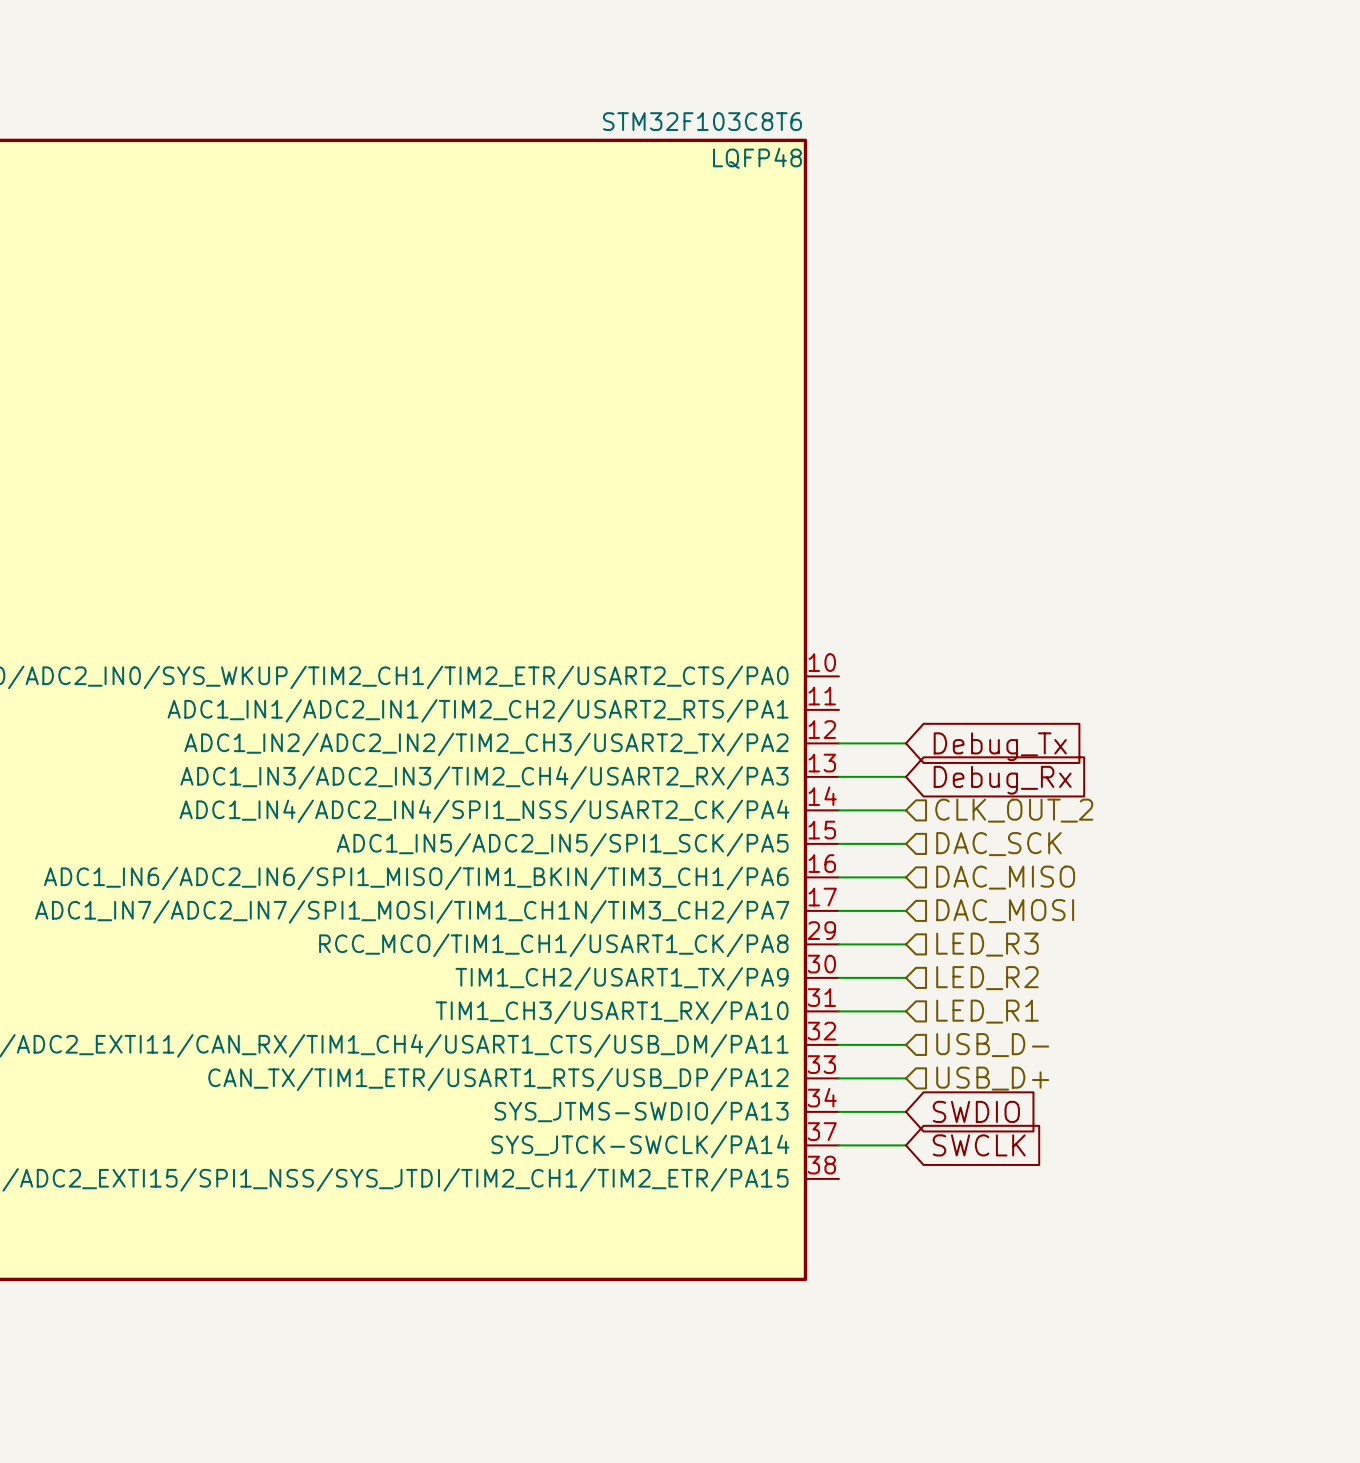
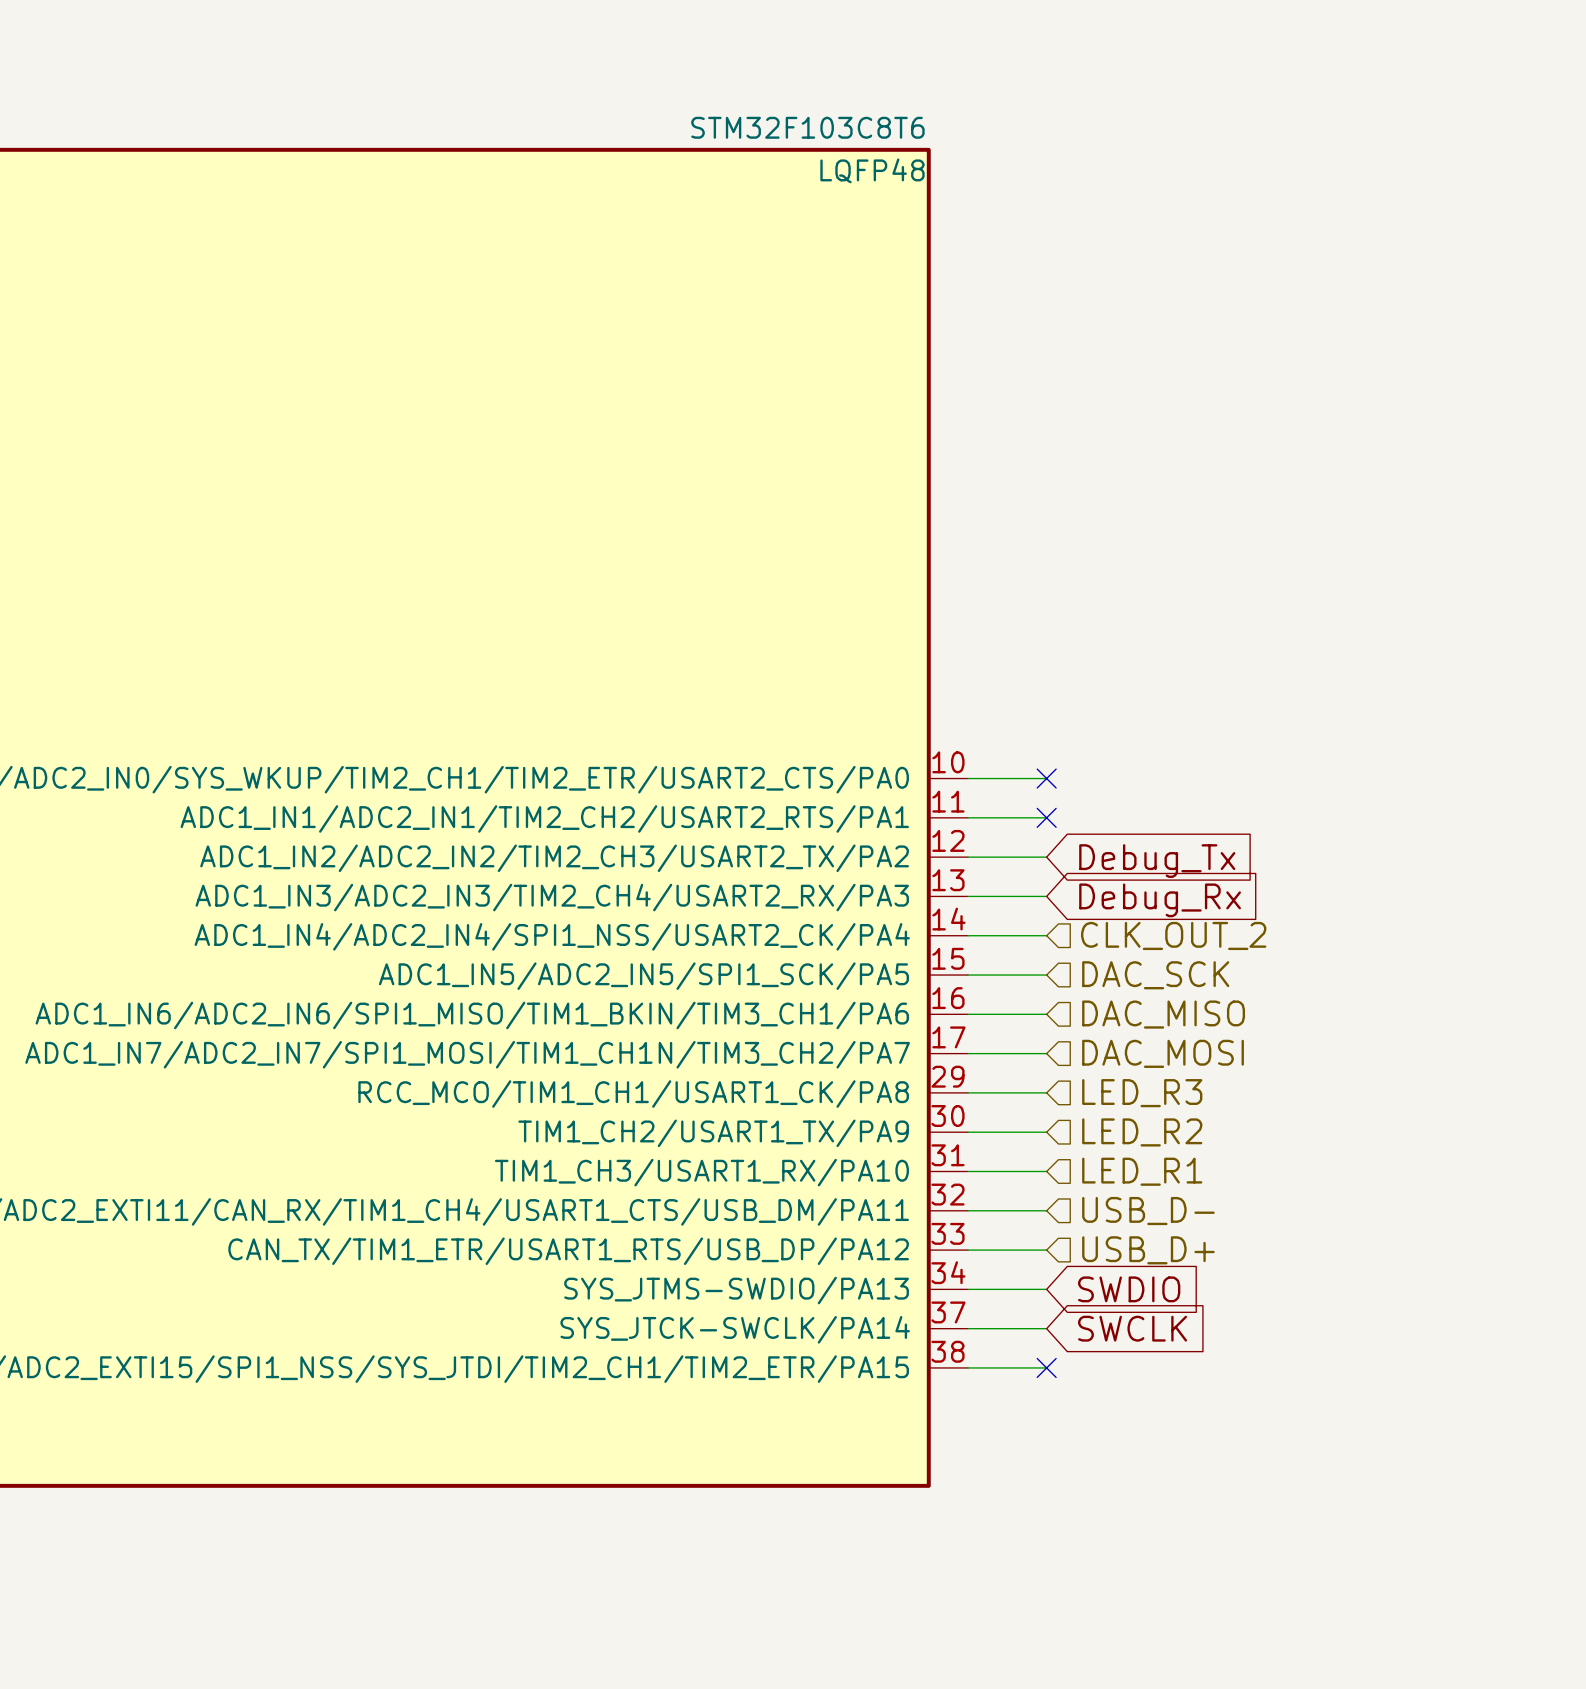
wire: none -> (968, 778) (1046, 778)
no-connect mark: none -> (1046, 778)
wire: none -> (968, 817) (1046, 817)
no-connect mark: none -> (1046, 817)
wire: none -> (968, 1367) (1046, 1367)
no-connect mark: none -> (1046, 1367)

